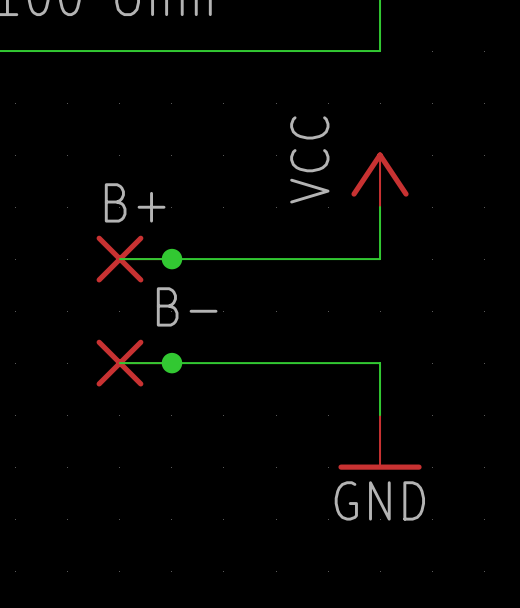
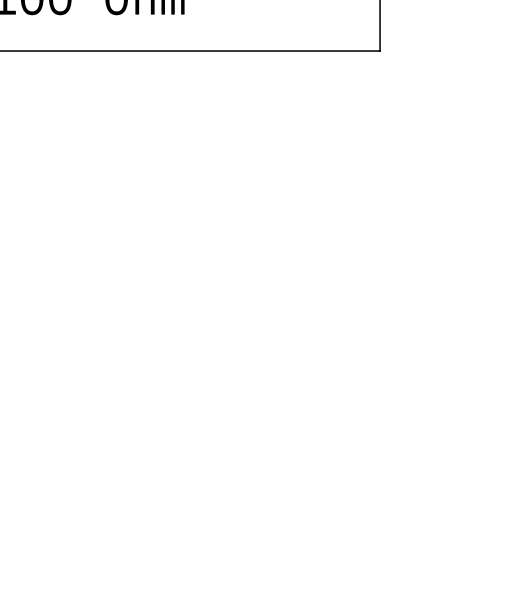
power symbol: VCC (380, 179) -> none
wire: (380, 207) (380, 259) (119, 259) -> none
B+: (134, 259) -> none
junction: (171, 259) -> none
wire: (119, 363) (380, 363) (380, 415) -> none
B-: (134, 363) -> none
junction: (171, 363) -> none
power symbol: GND (380, 442) -> none

